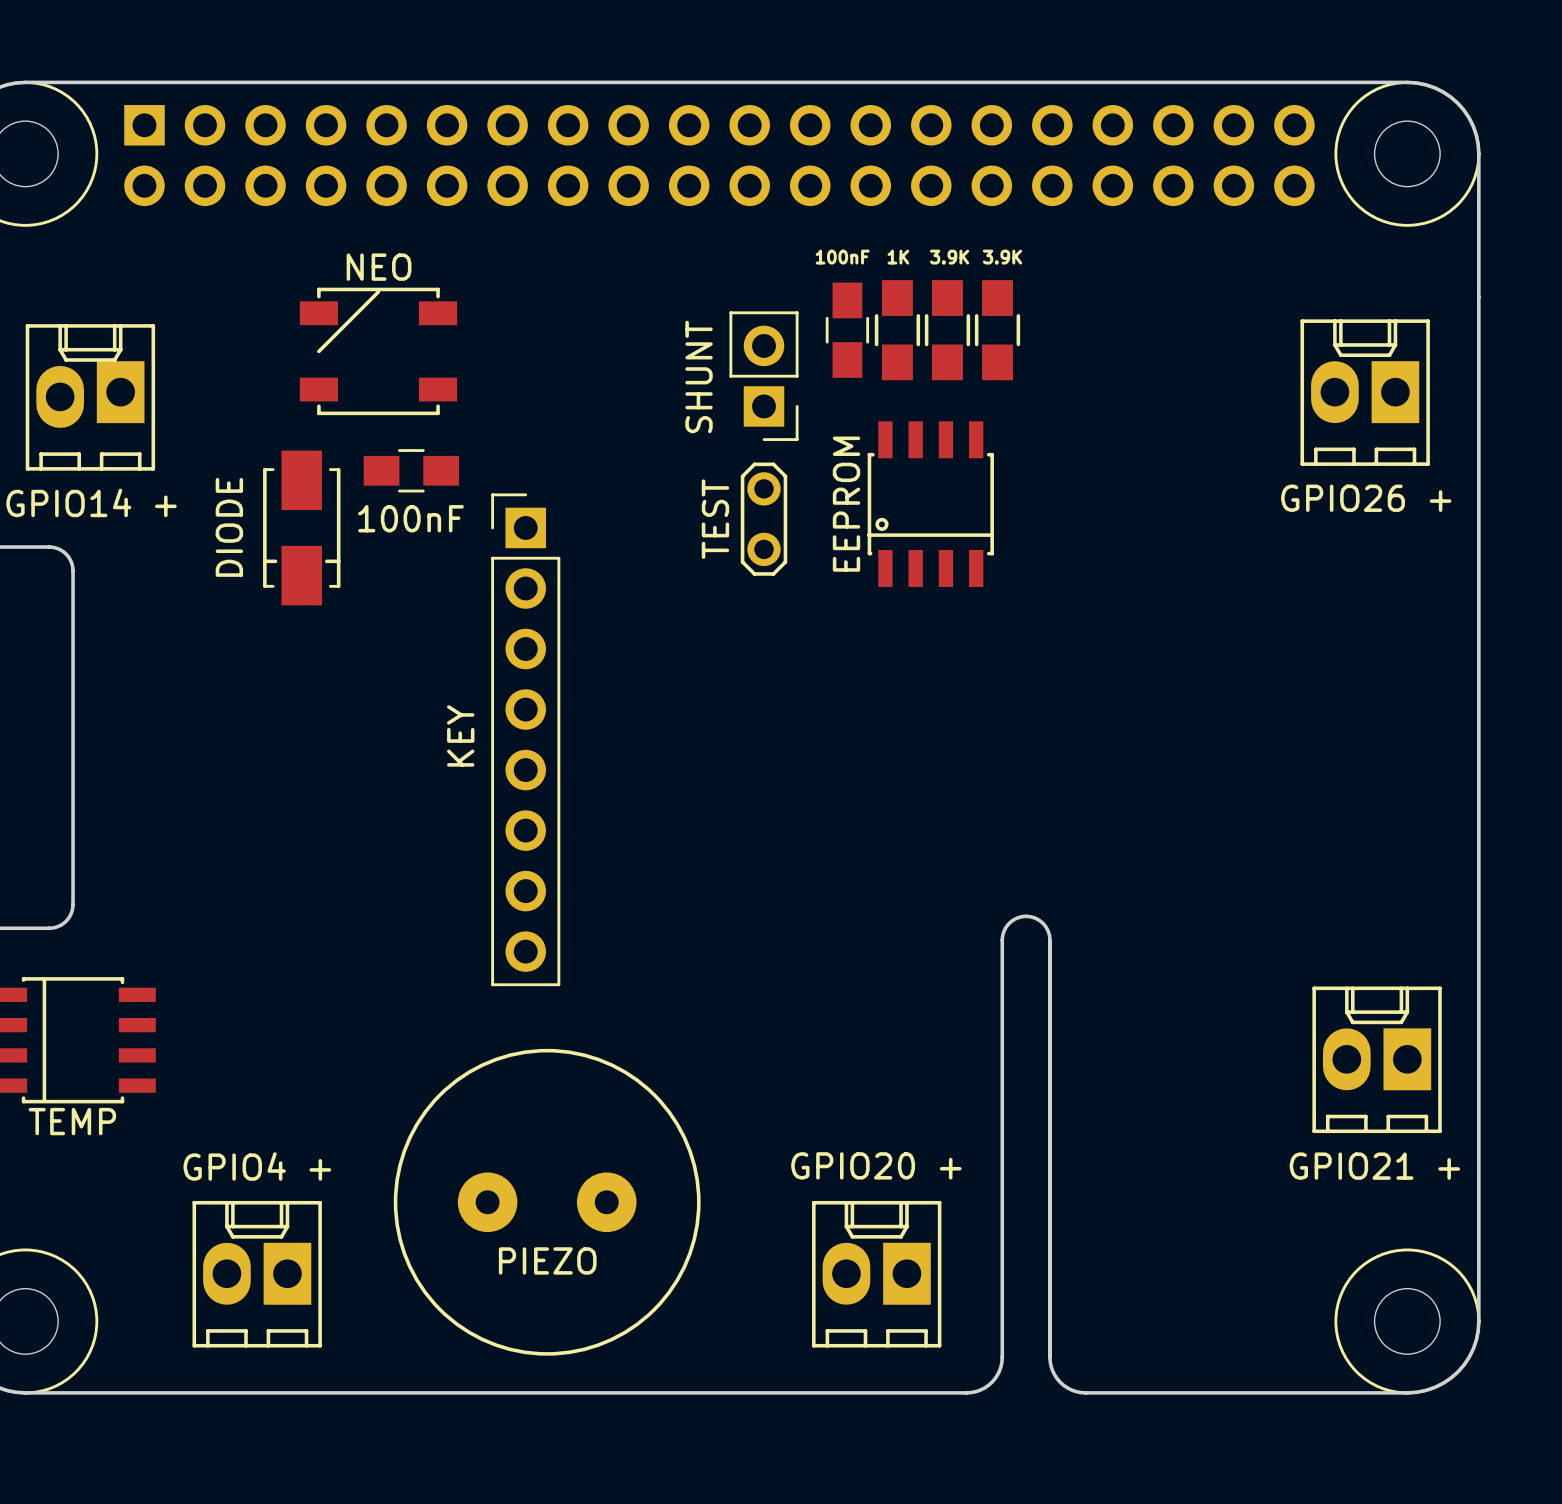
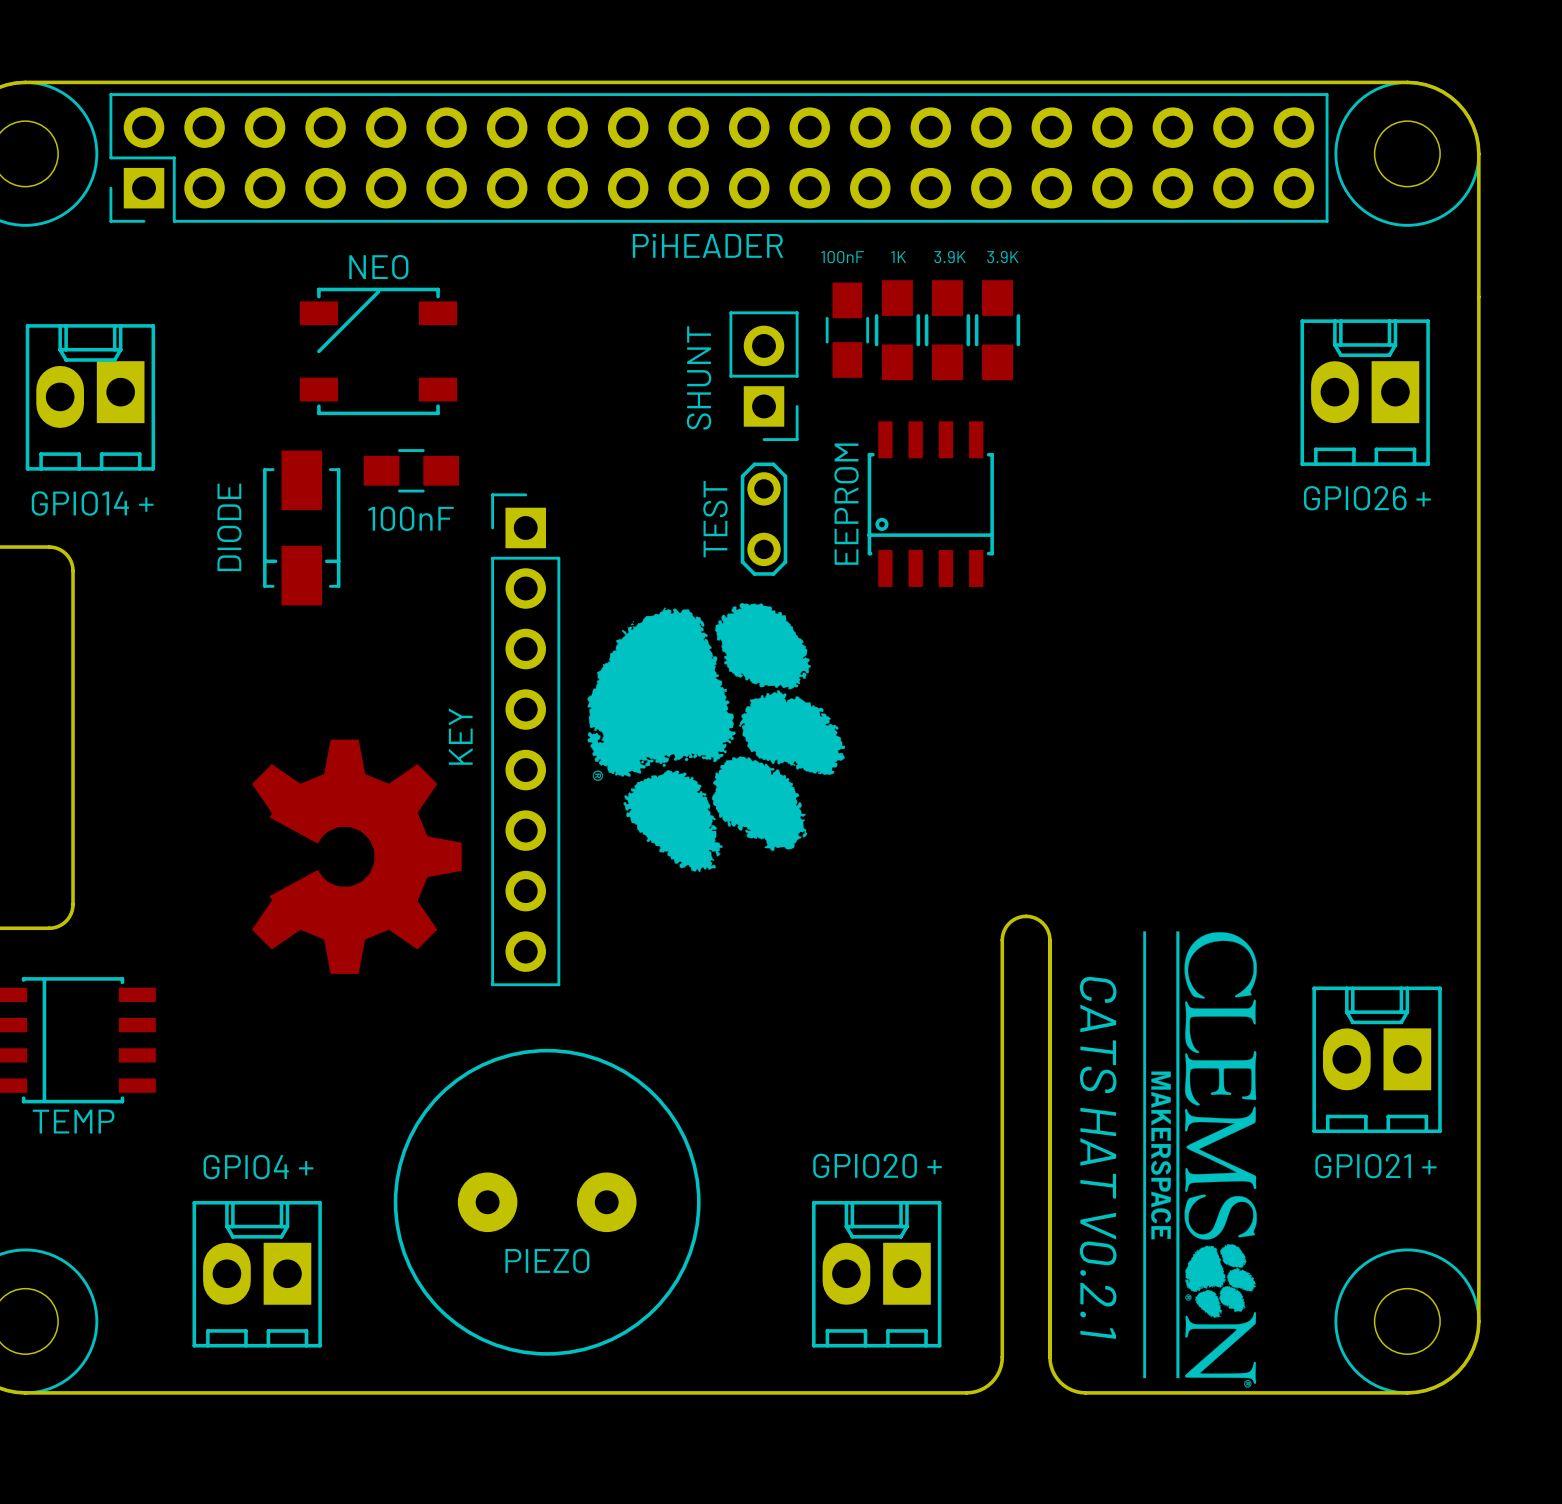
PiHEADER side: bottom (719, 155) -> top (718, 157)
drawing: none -> [587, 603, 846, 873]
part: none -> (356, 856)
drawing: none -> [1143, 931, 1257, 1388]
text: none -> CATS HAT V0.2.1 (1098, 1157)

